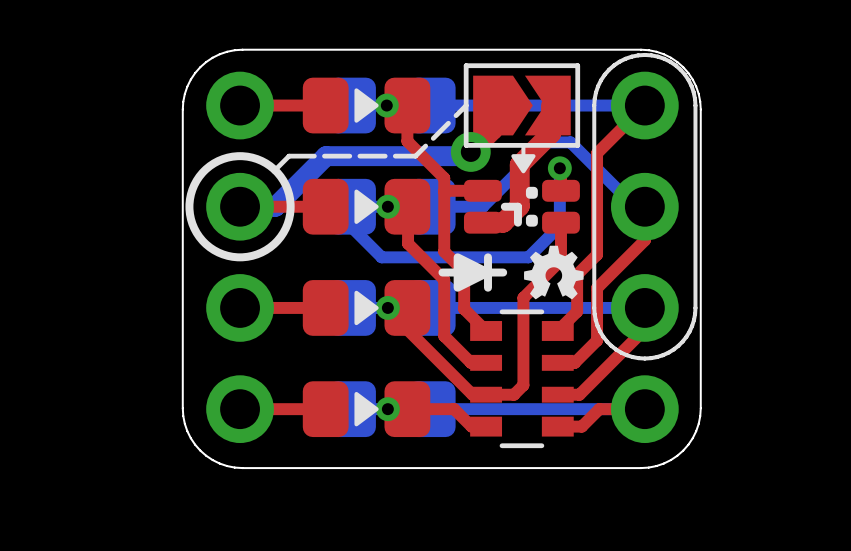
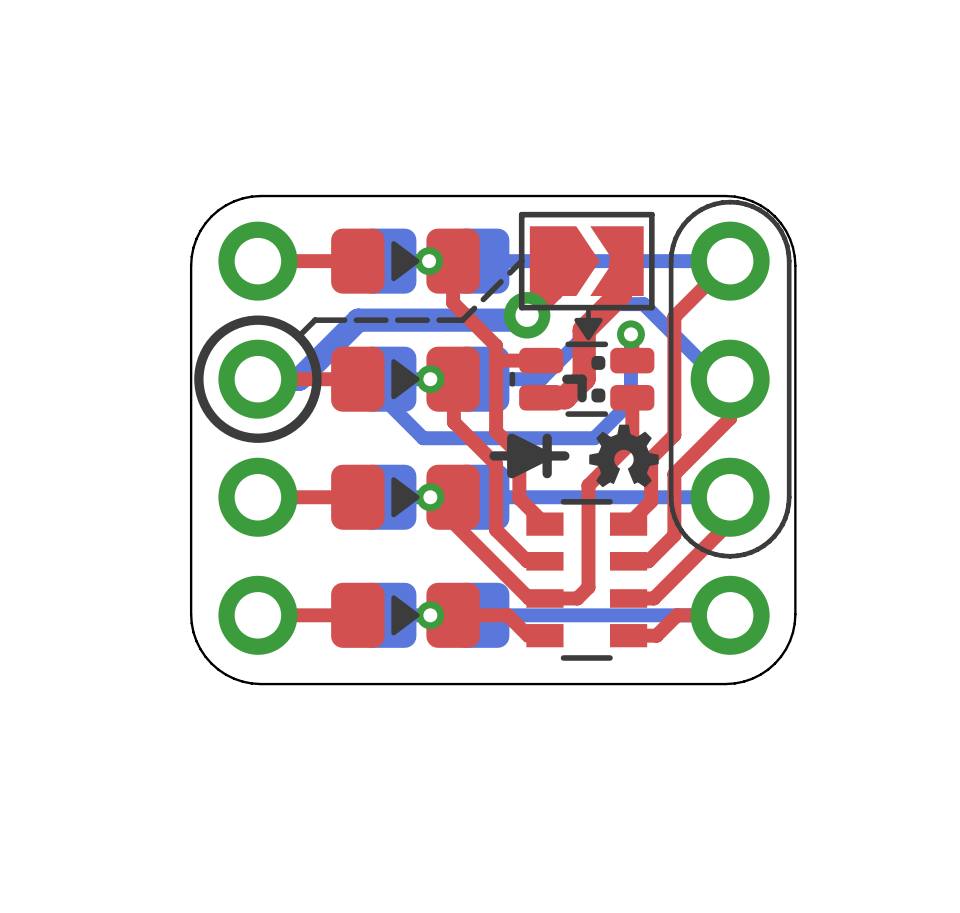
part footprint: [463, 179, 580, 234] -> [509, 341, 655, 417]

